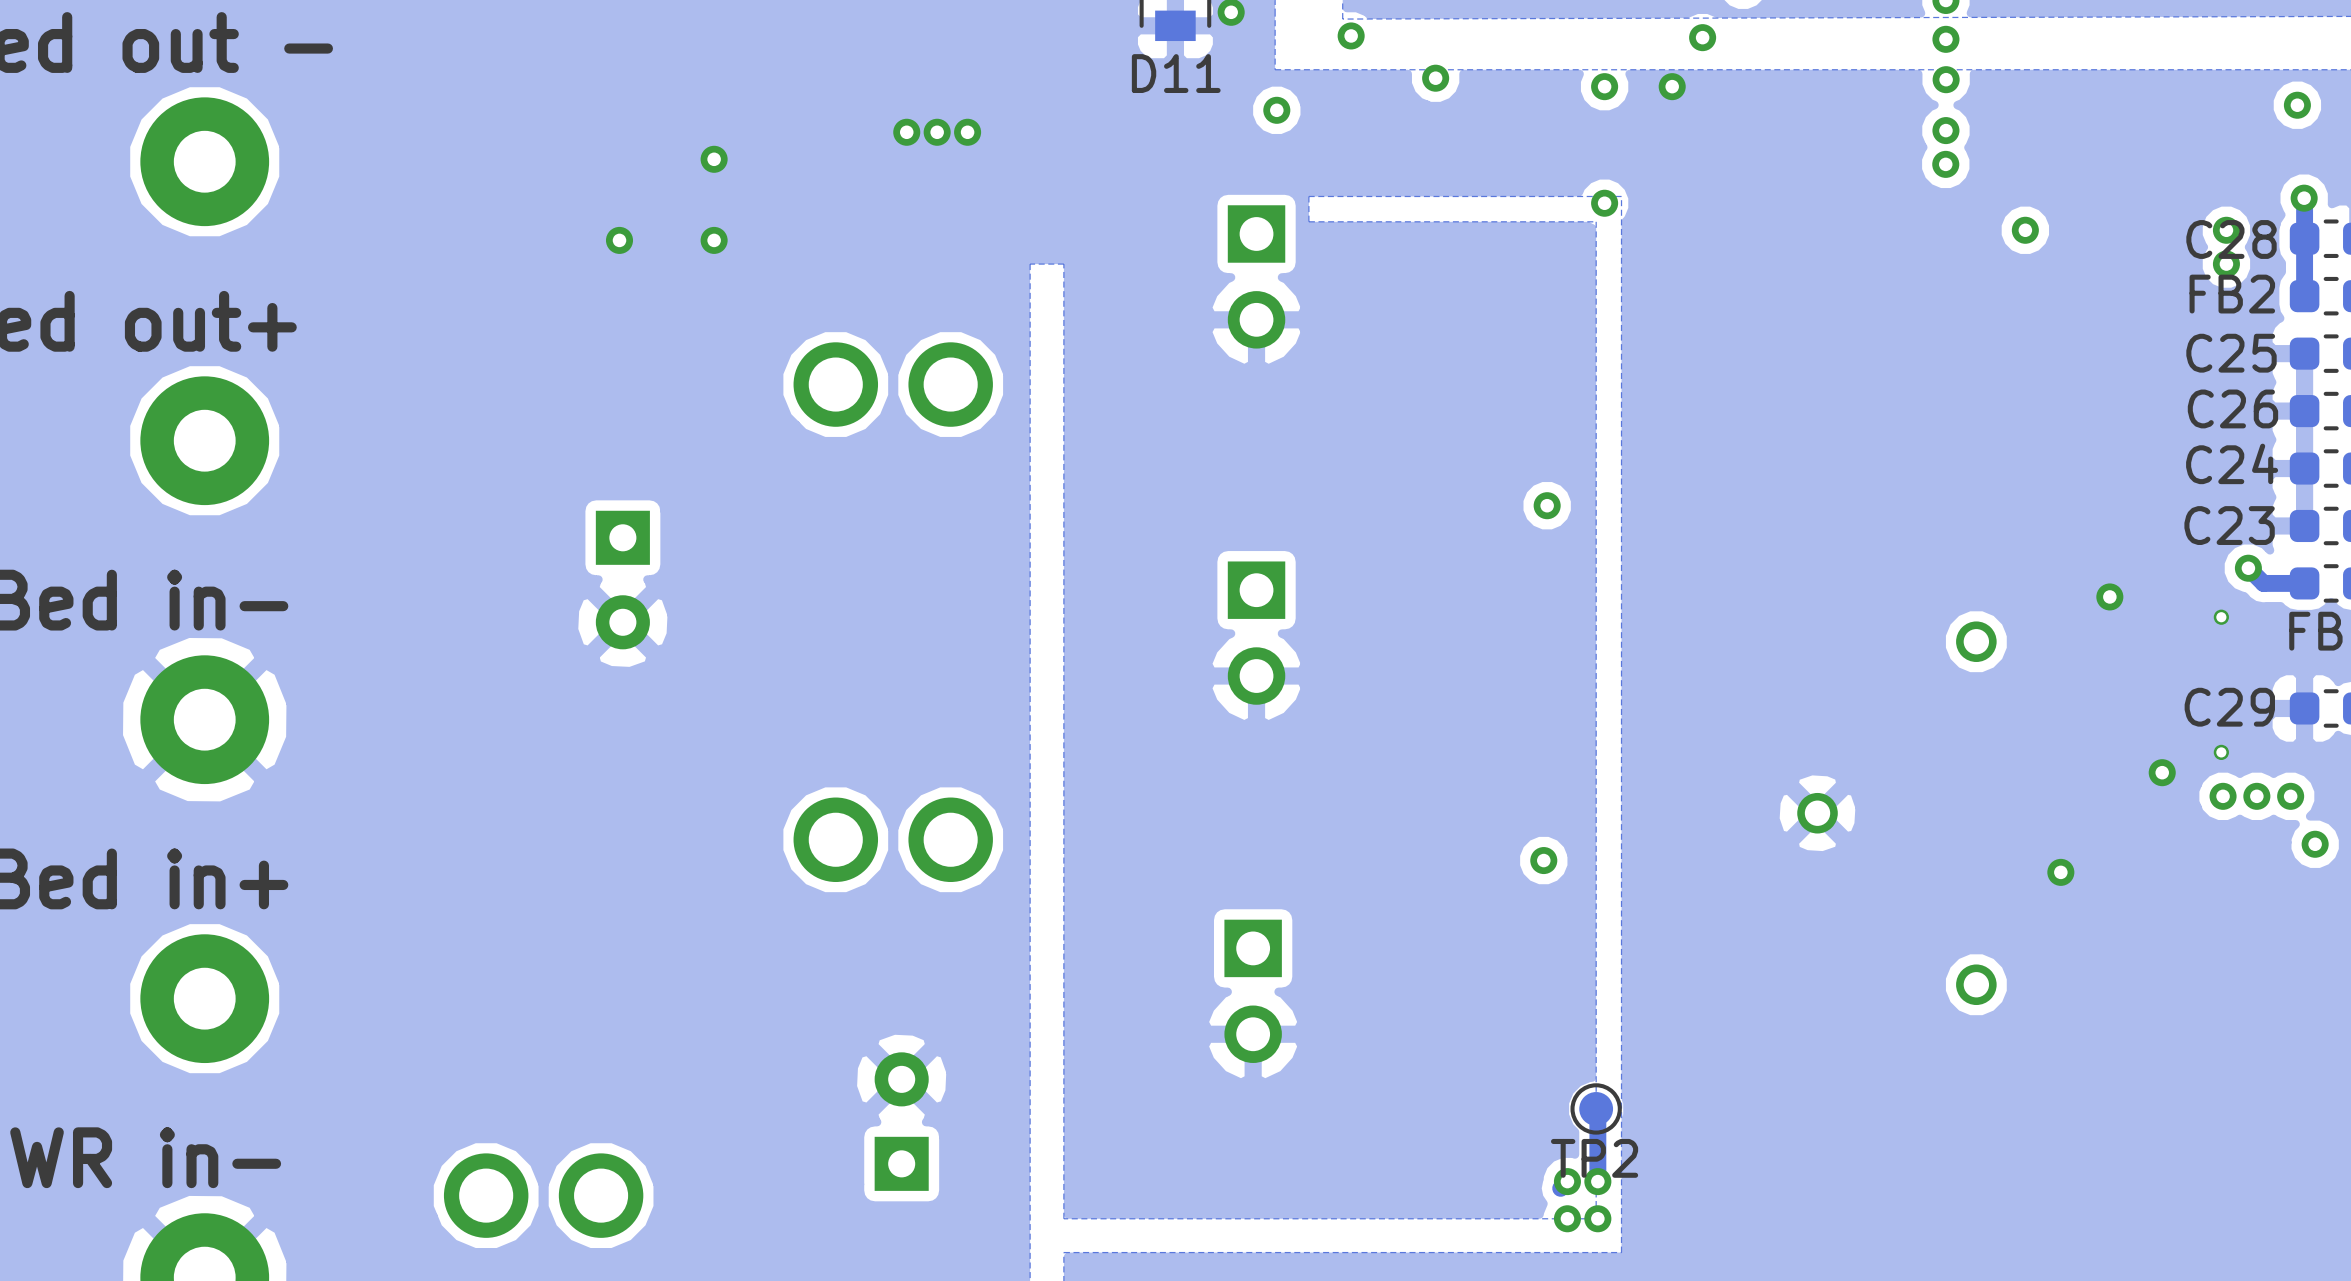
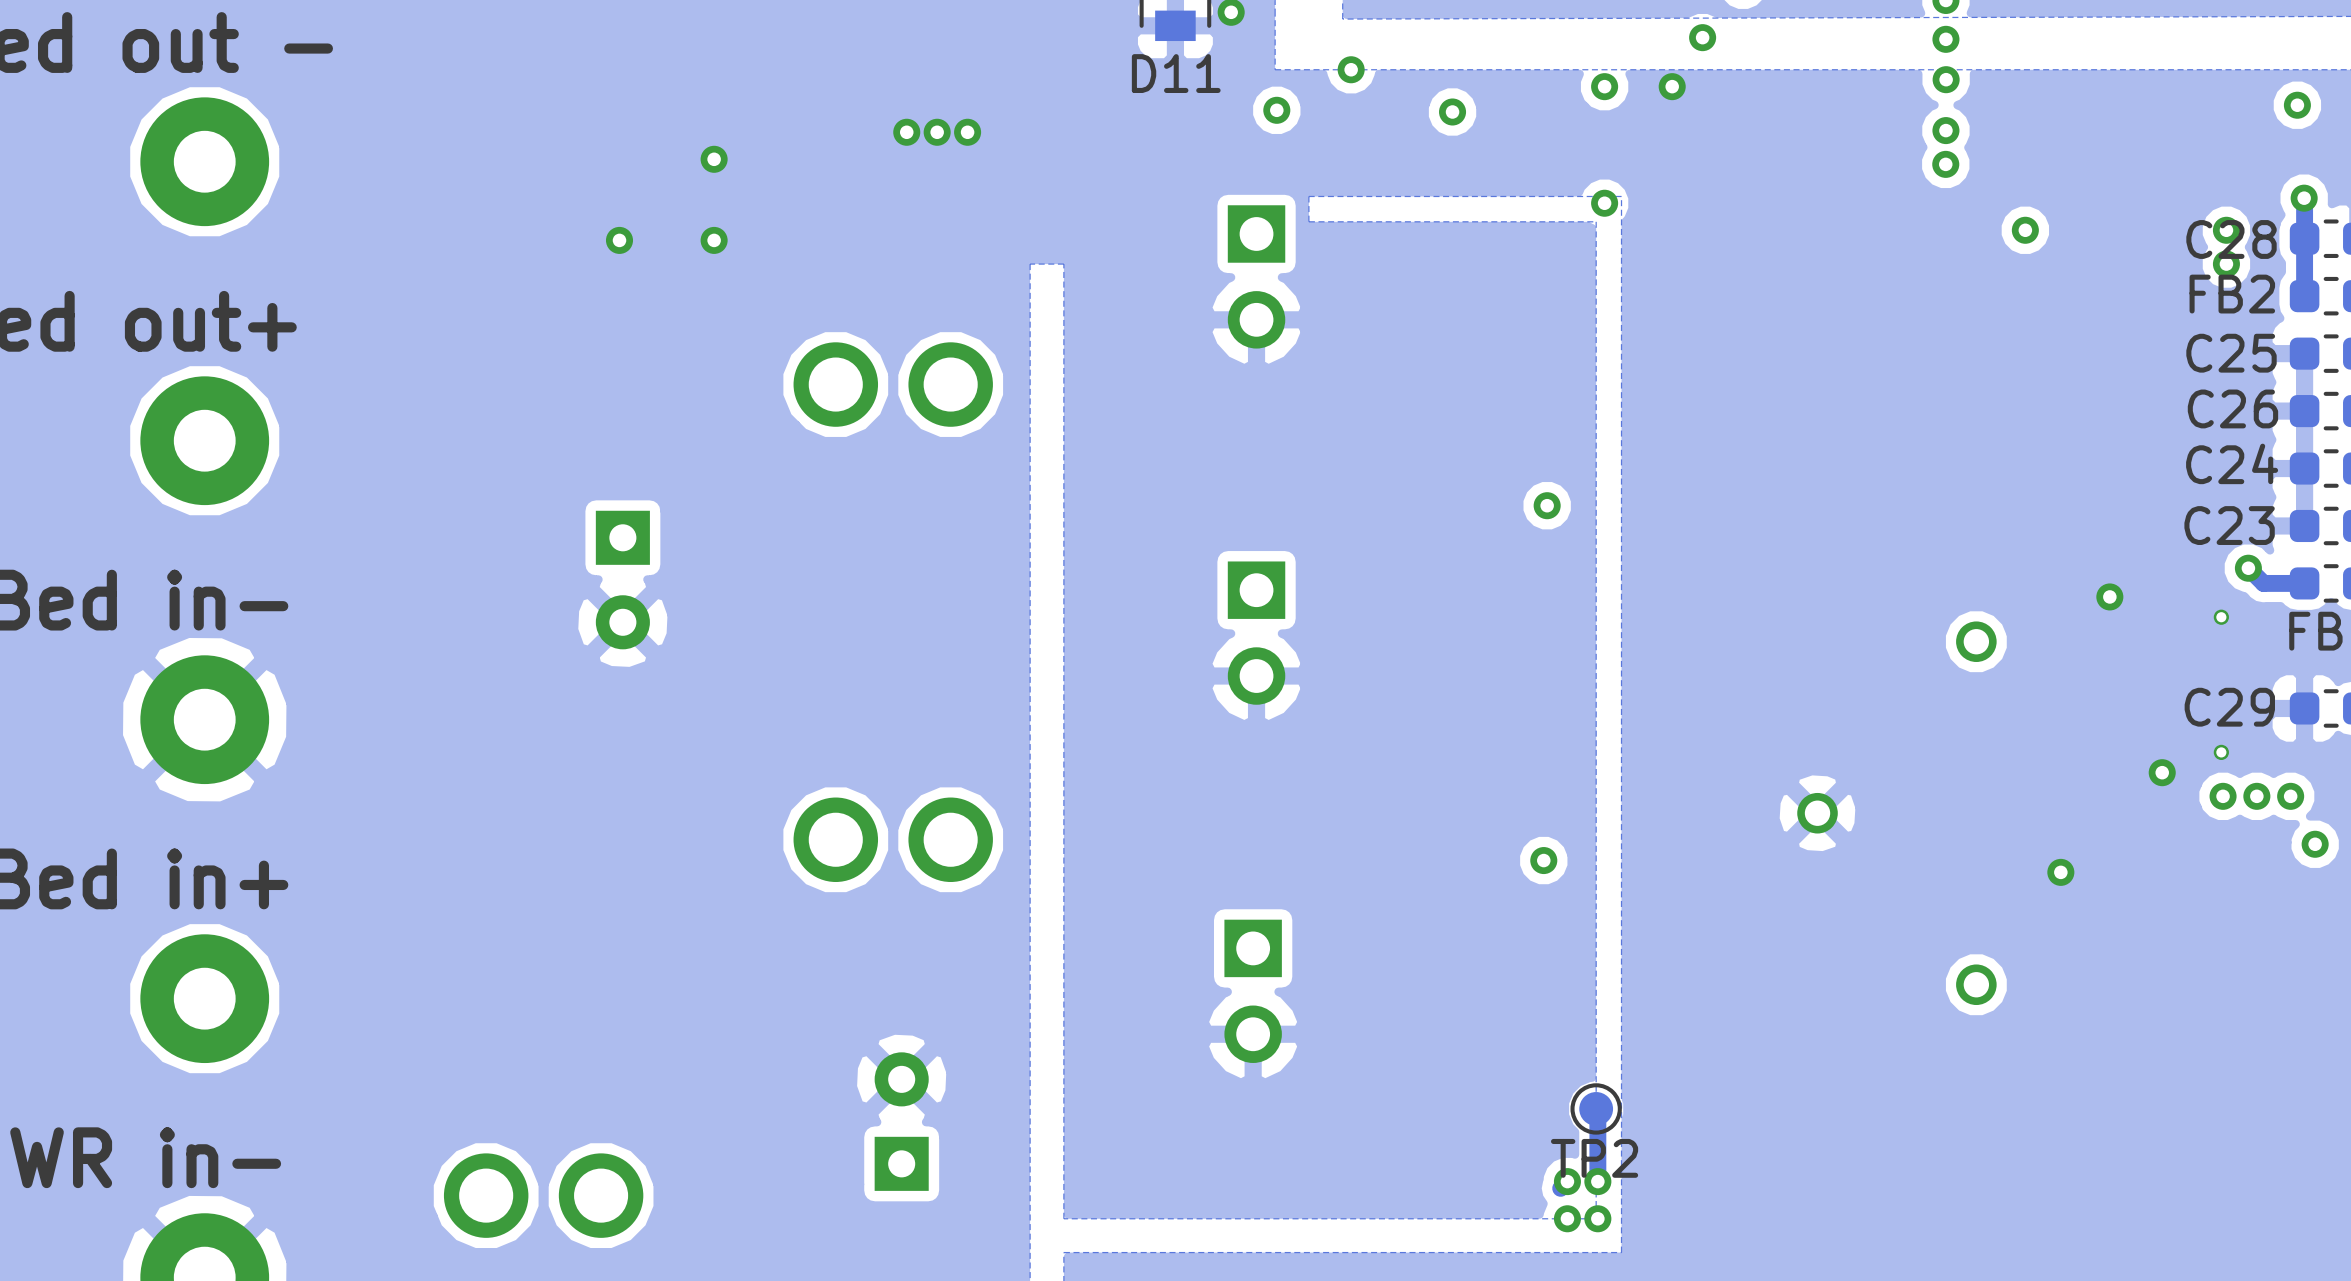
via position: (1351, 35) -> (1351, 69)
via position: (1435, 78) -> (1452, 111)

